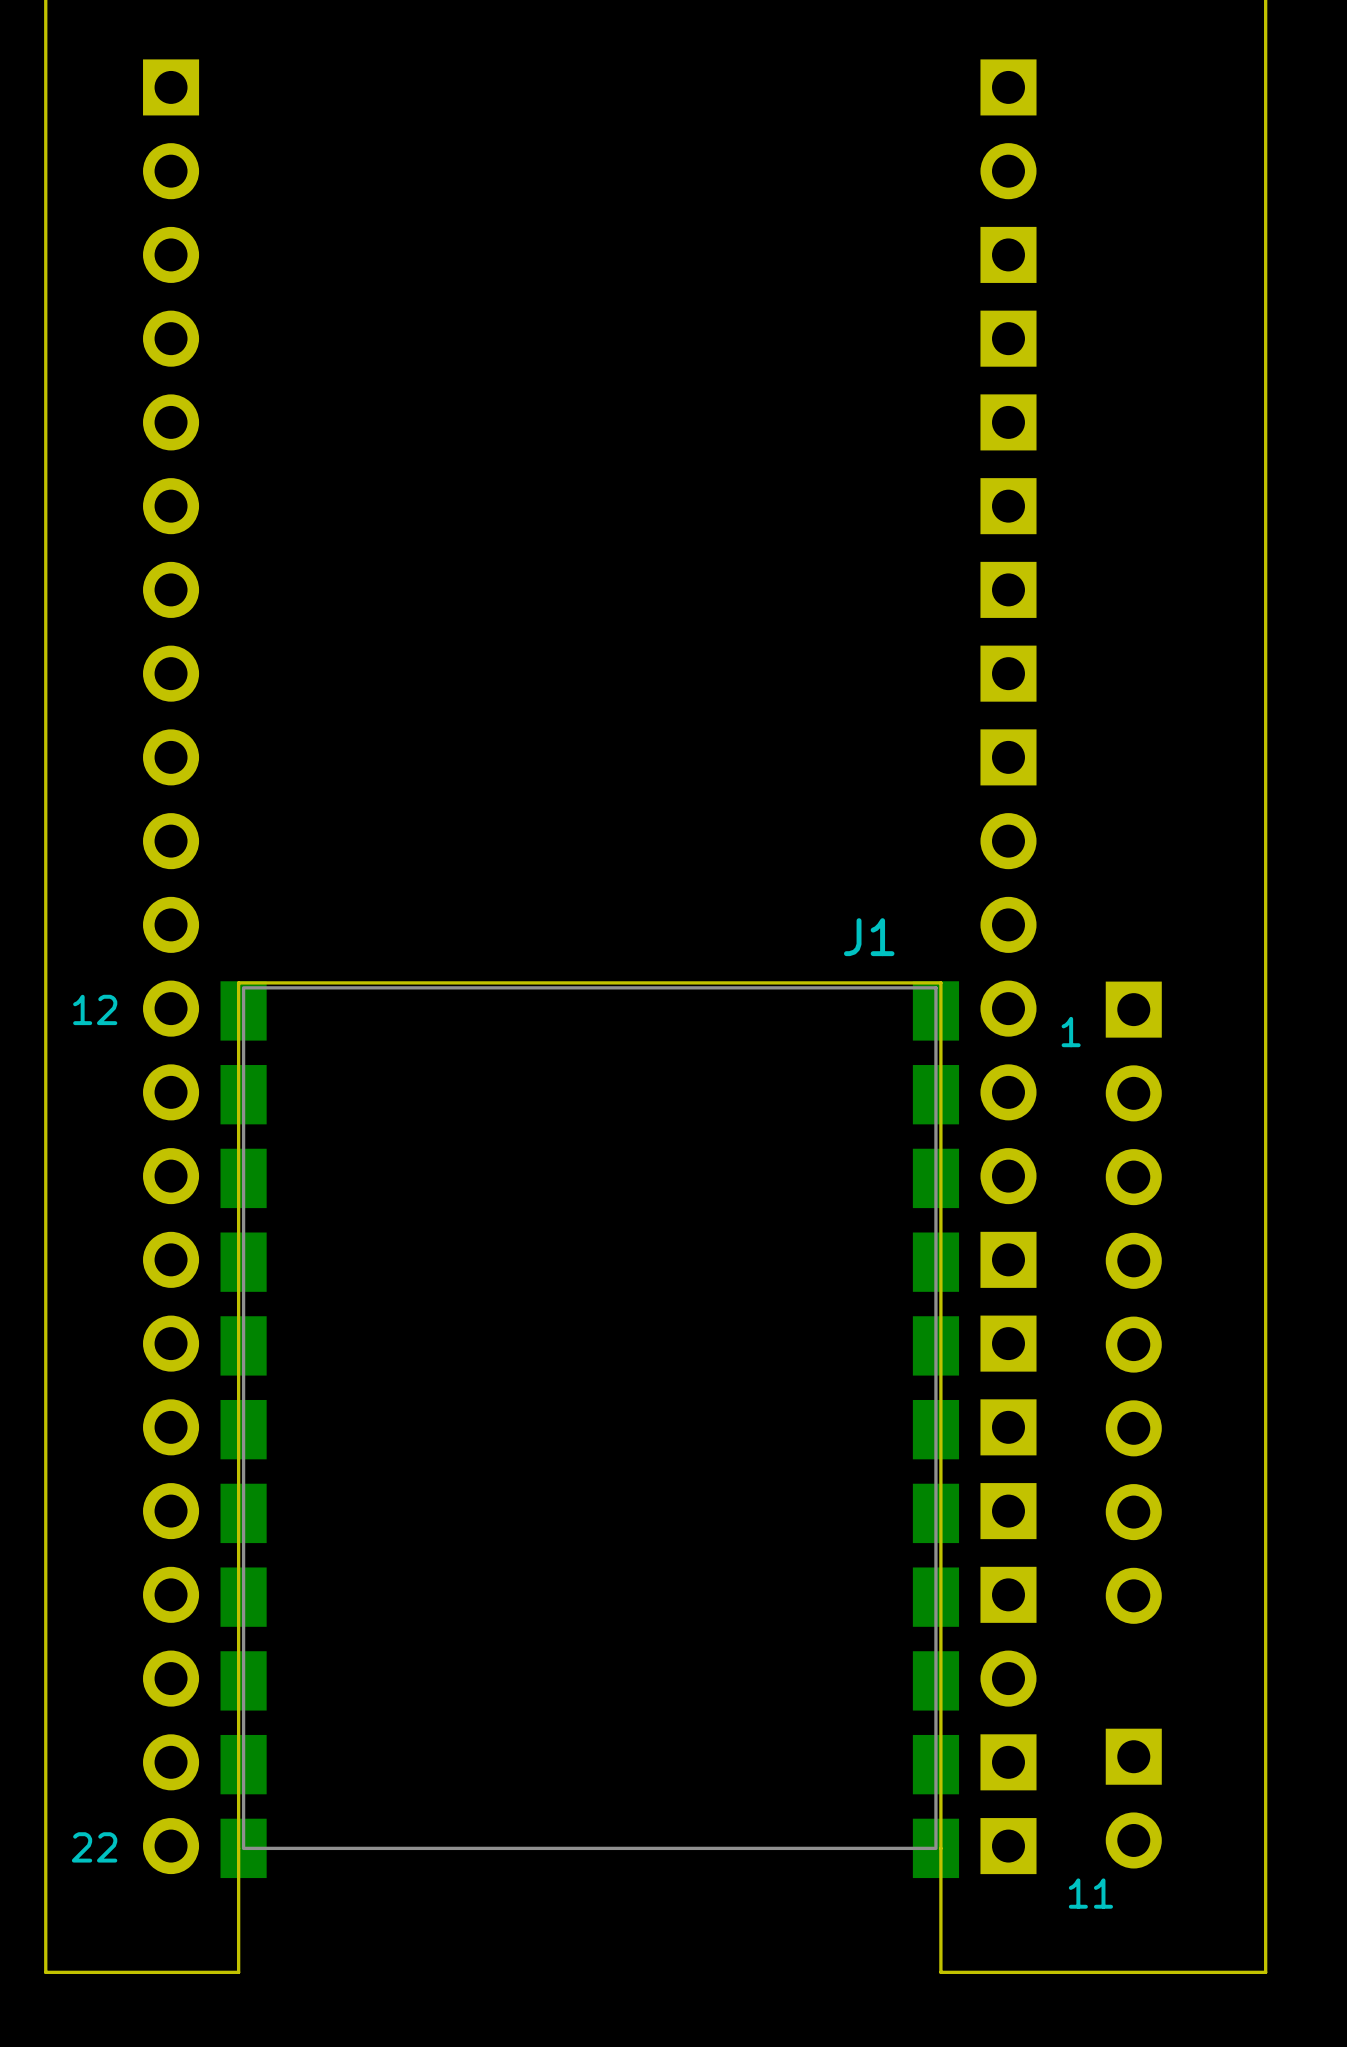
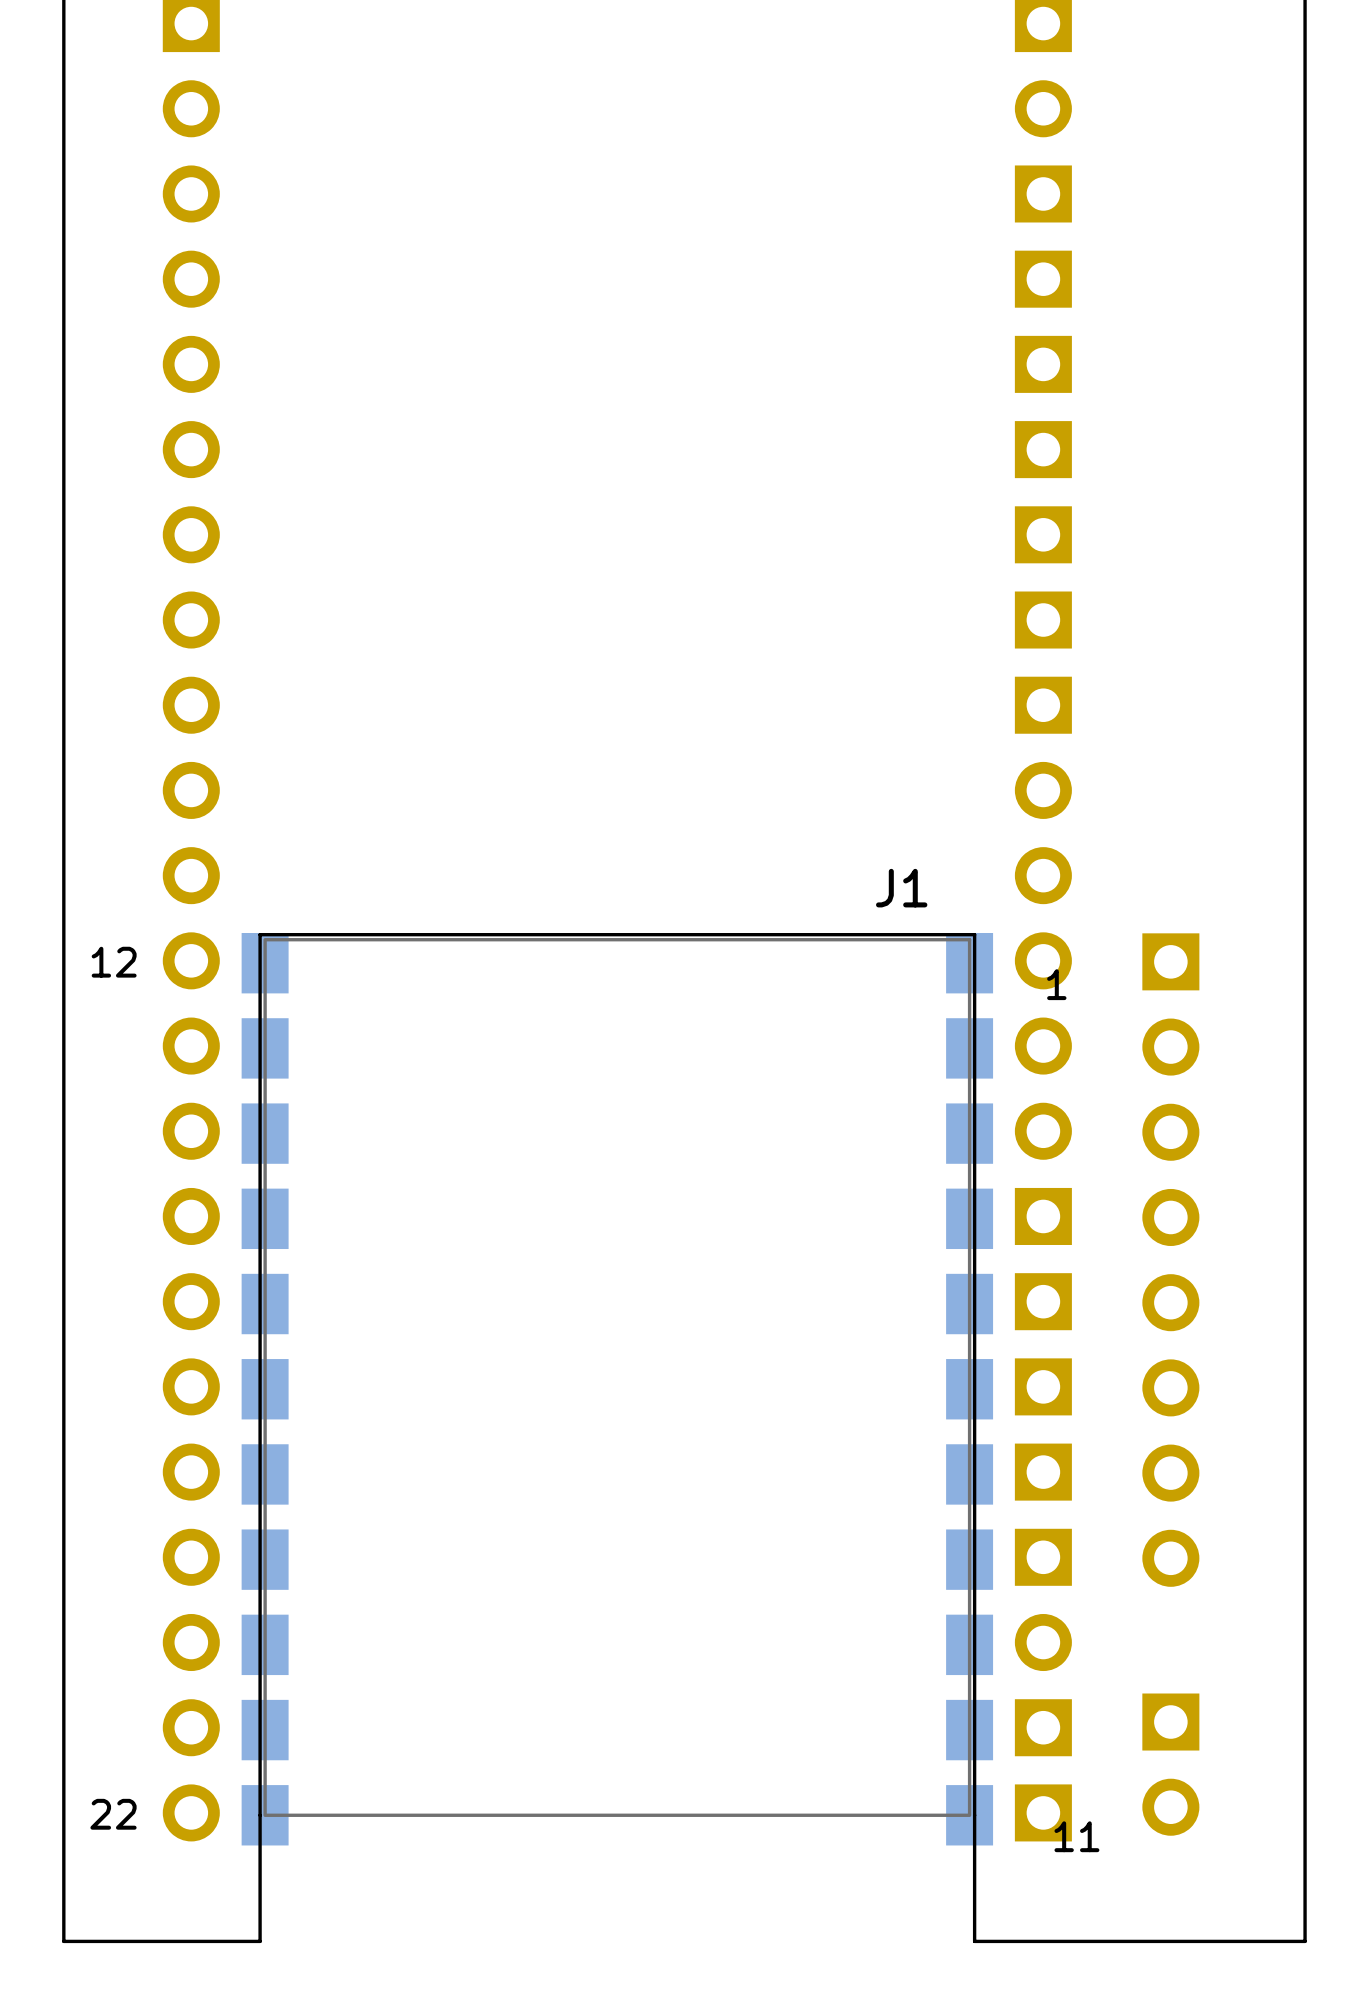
J1 text position: 1 (1071, 1032) -> 1 (1056, 984)
J1 text position: 11 (1090, 1893) -> 11 (1076, 1836)

